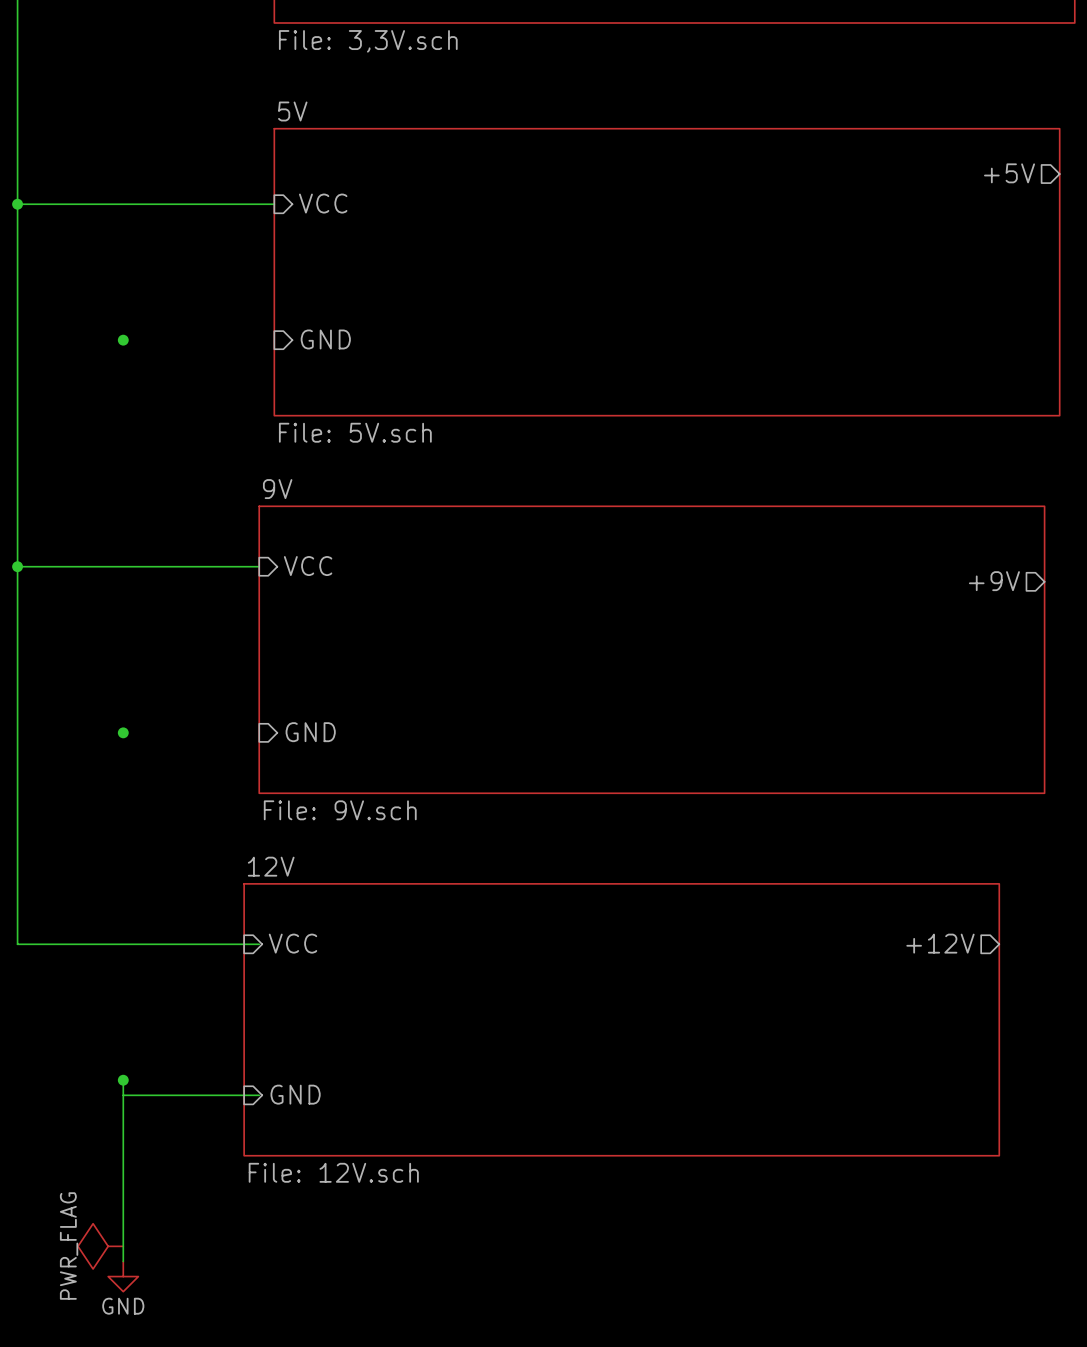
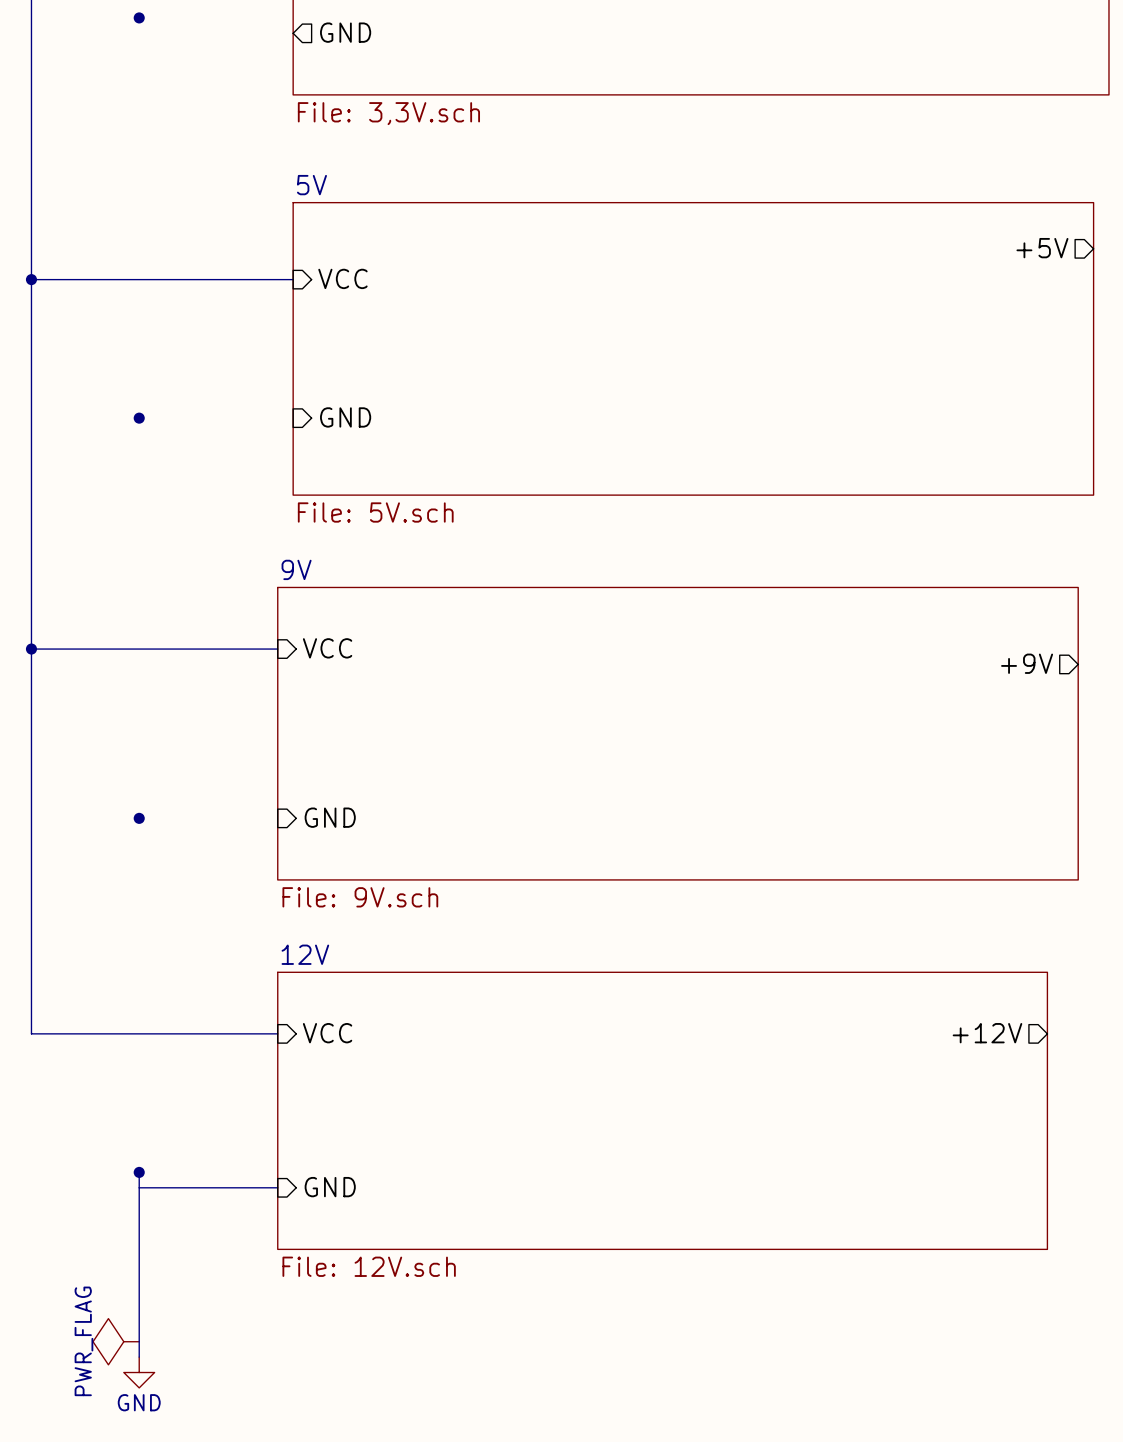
sheet pin position: VCC (292, 943) -> VCC (327, 1033)
sheet pin position: +12V (940, 943) -> +12V (987, 1033)
sheet 12V position: (621, 1019) -> (662, 1110)
sheet pin position: GND (295, 1094) -> GND (330, 1187)

